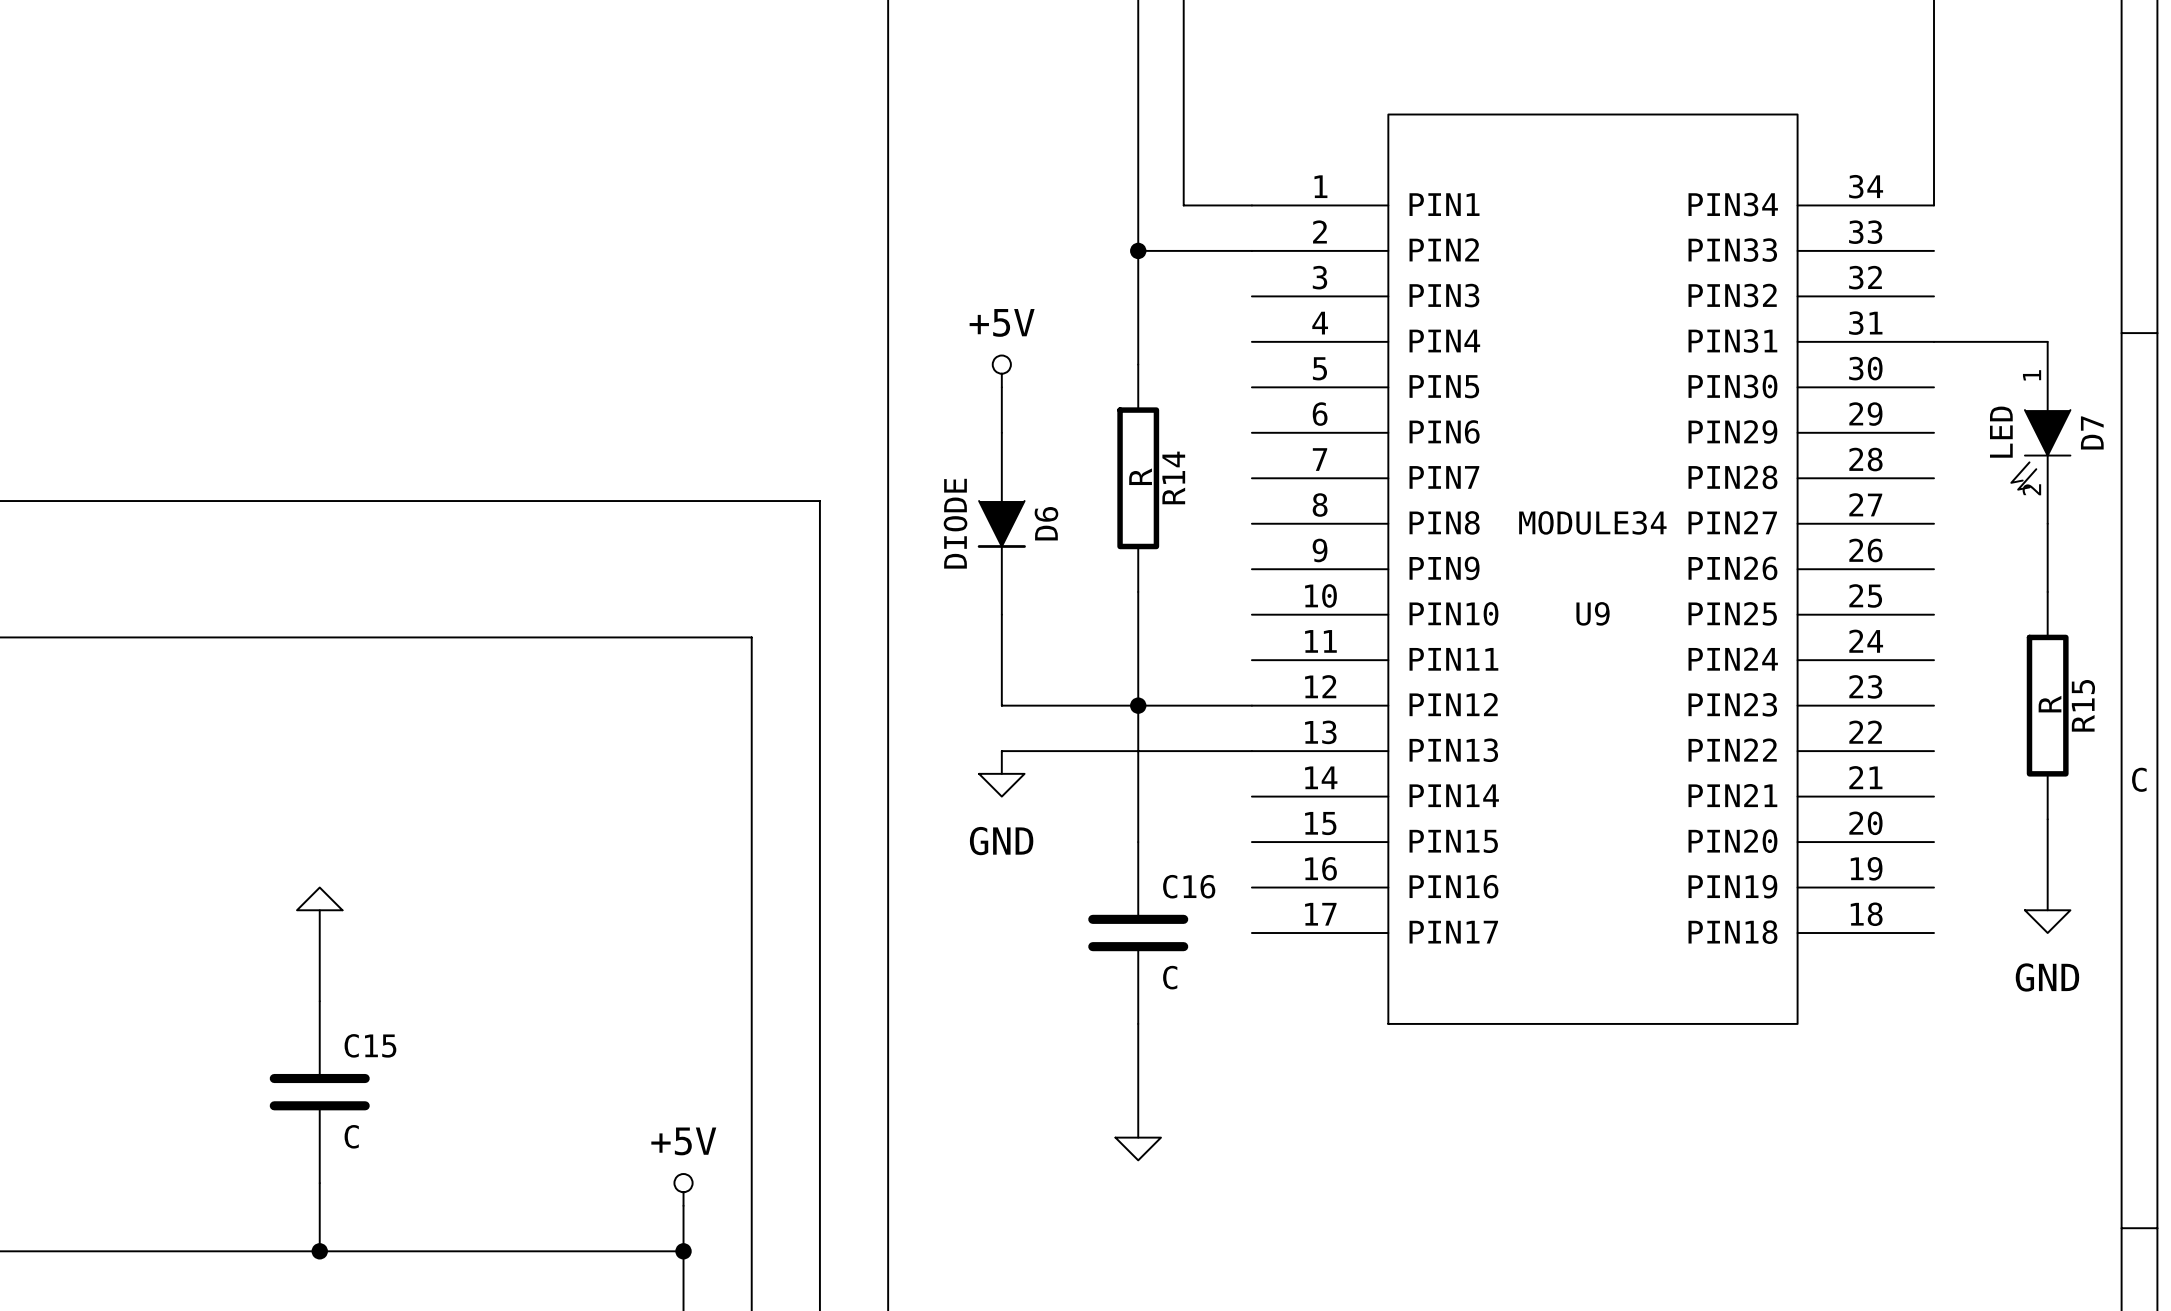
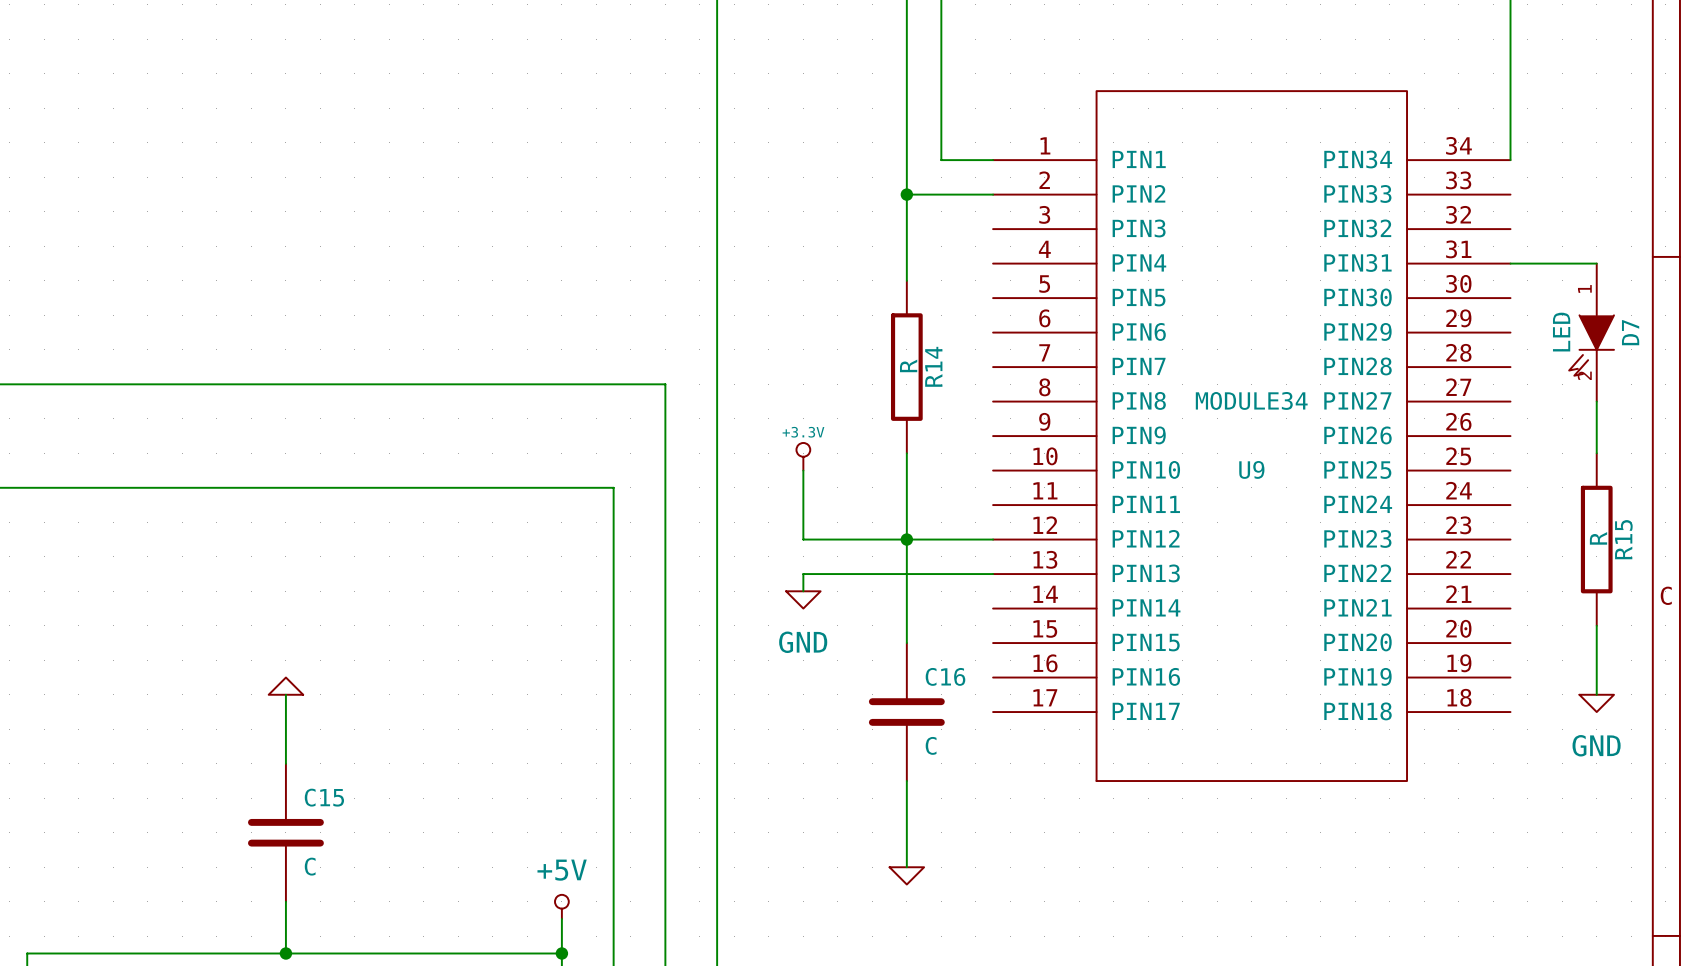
power symbol: +5V (1001, 371) -> none
wire: (1001, 387) (1001, 432) -> none
D6: DIODE (1001, 523) -> none
power symbol: none -> +3.3V (803, 456)

